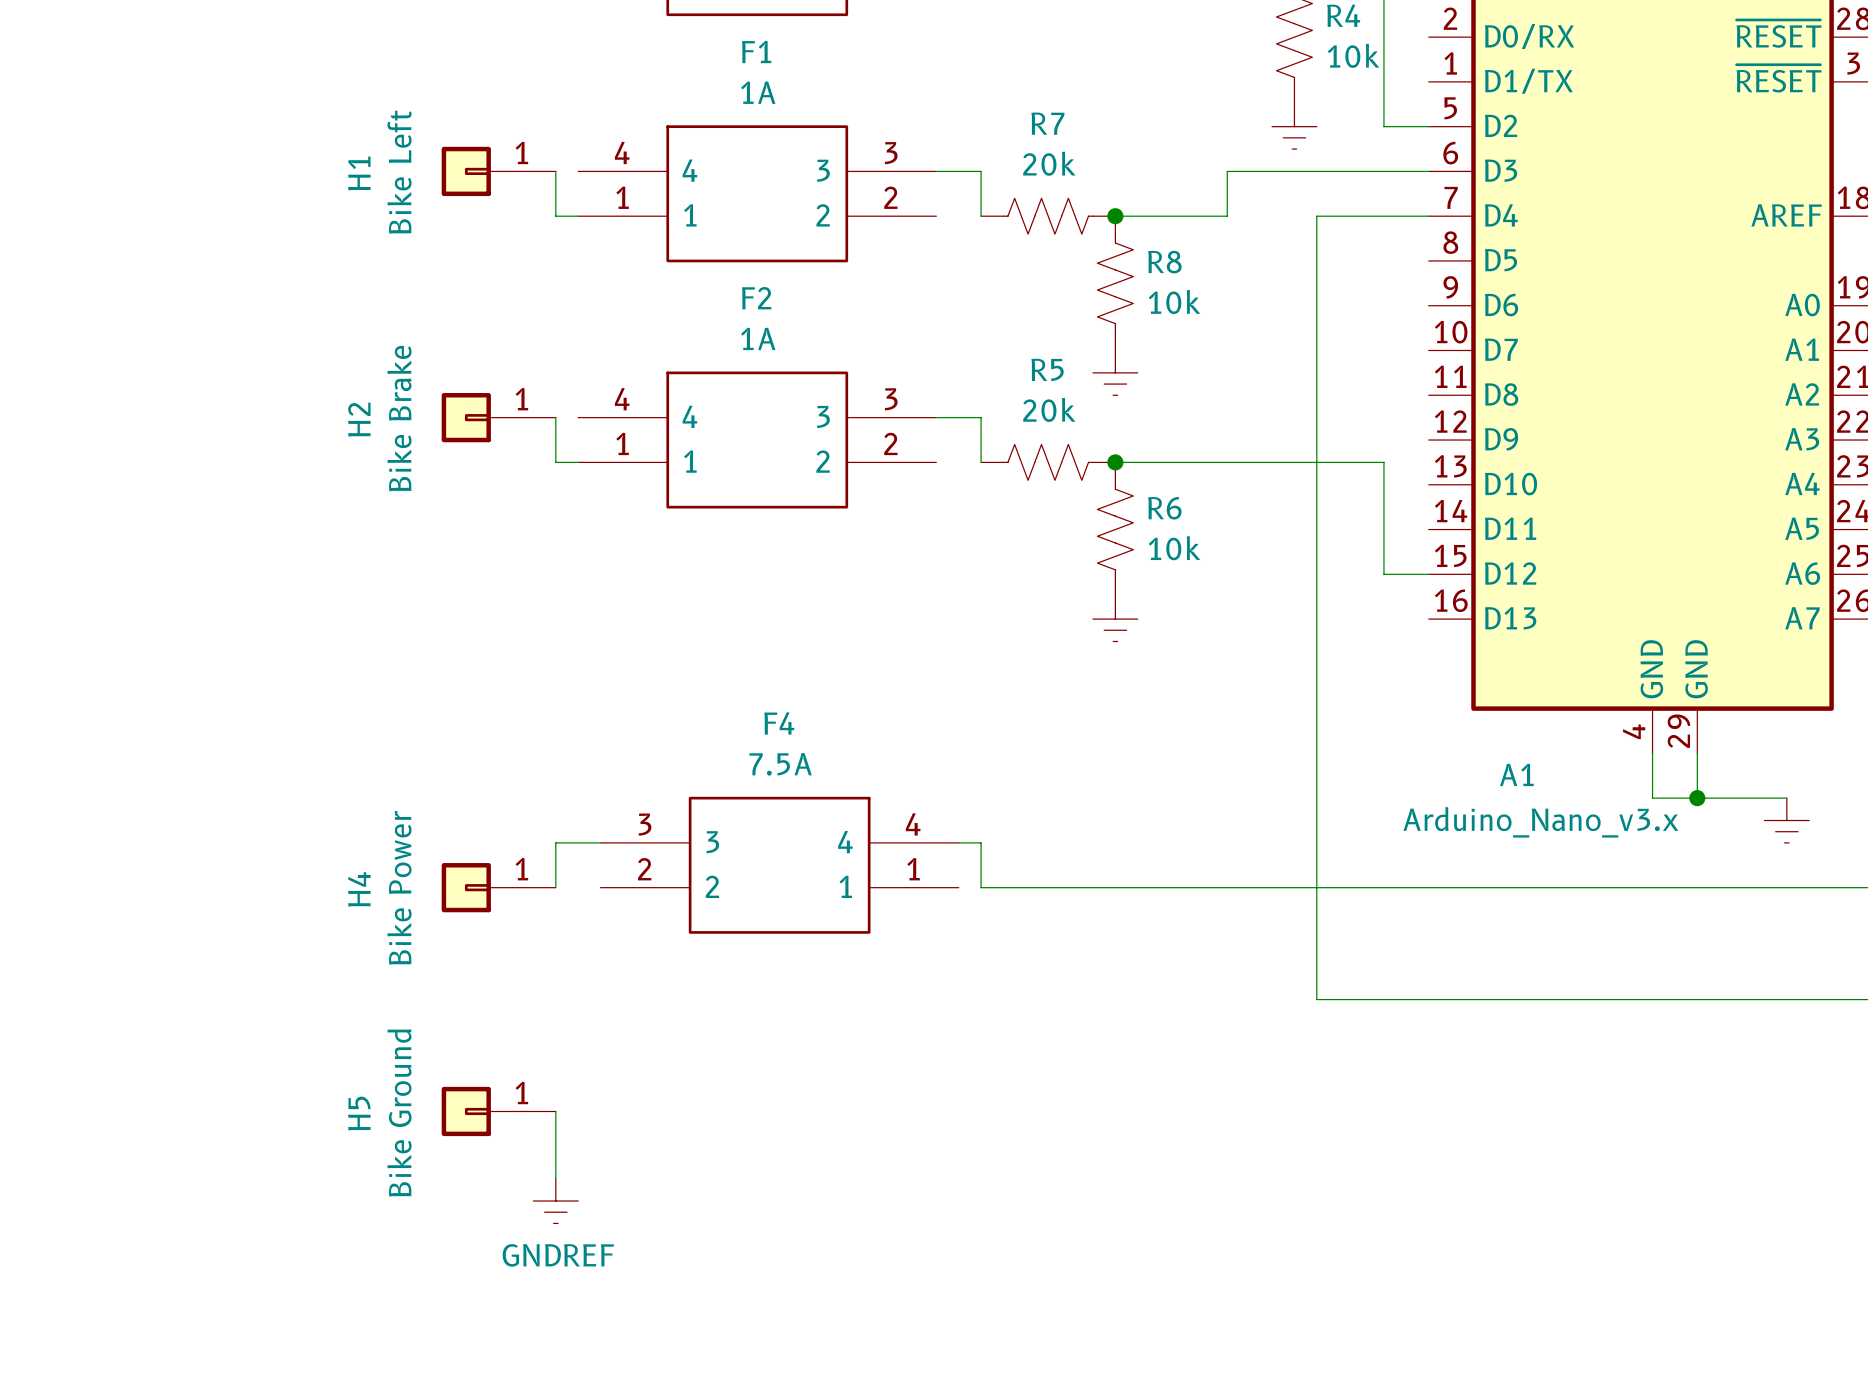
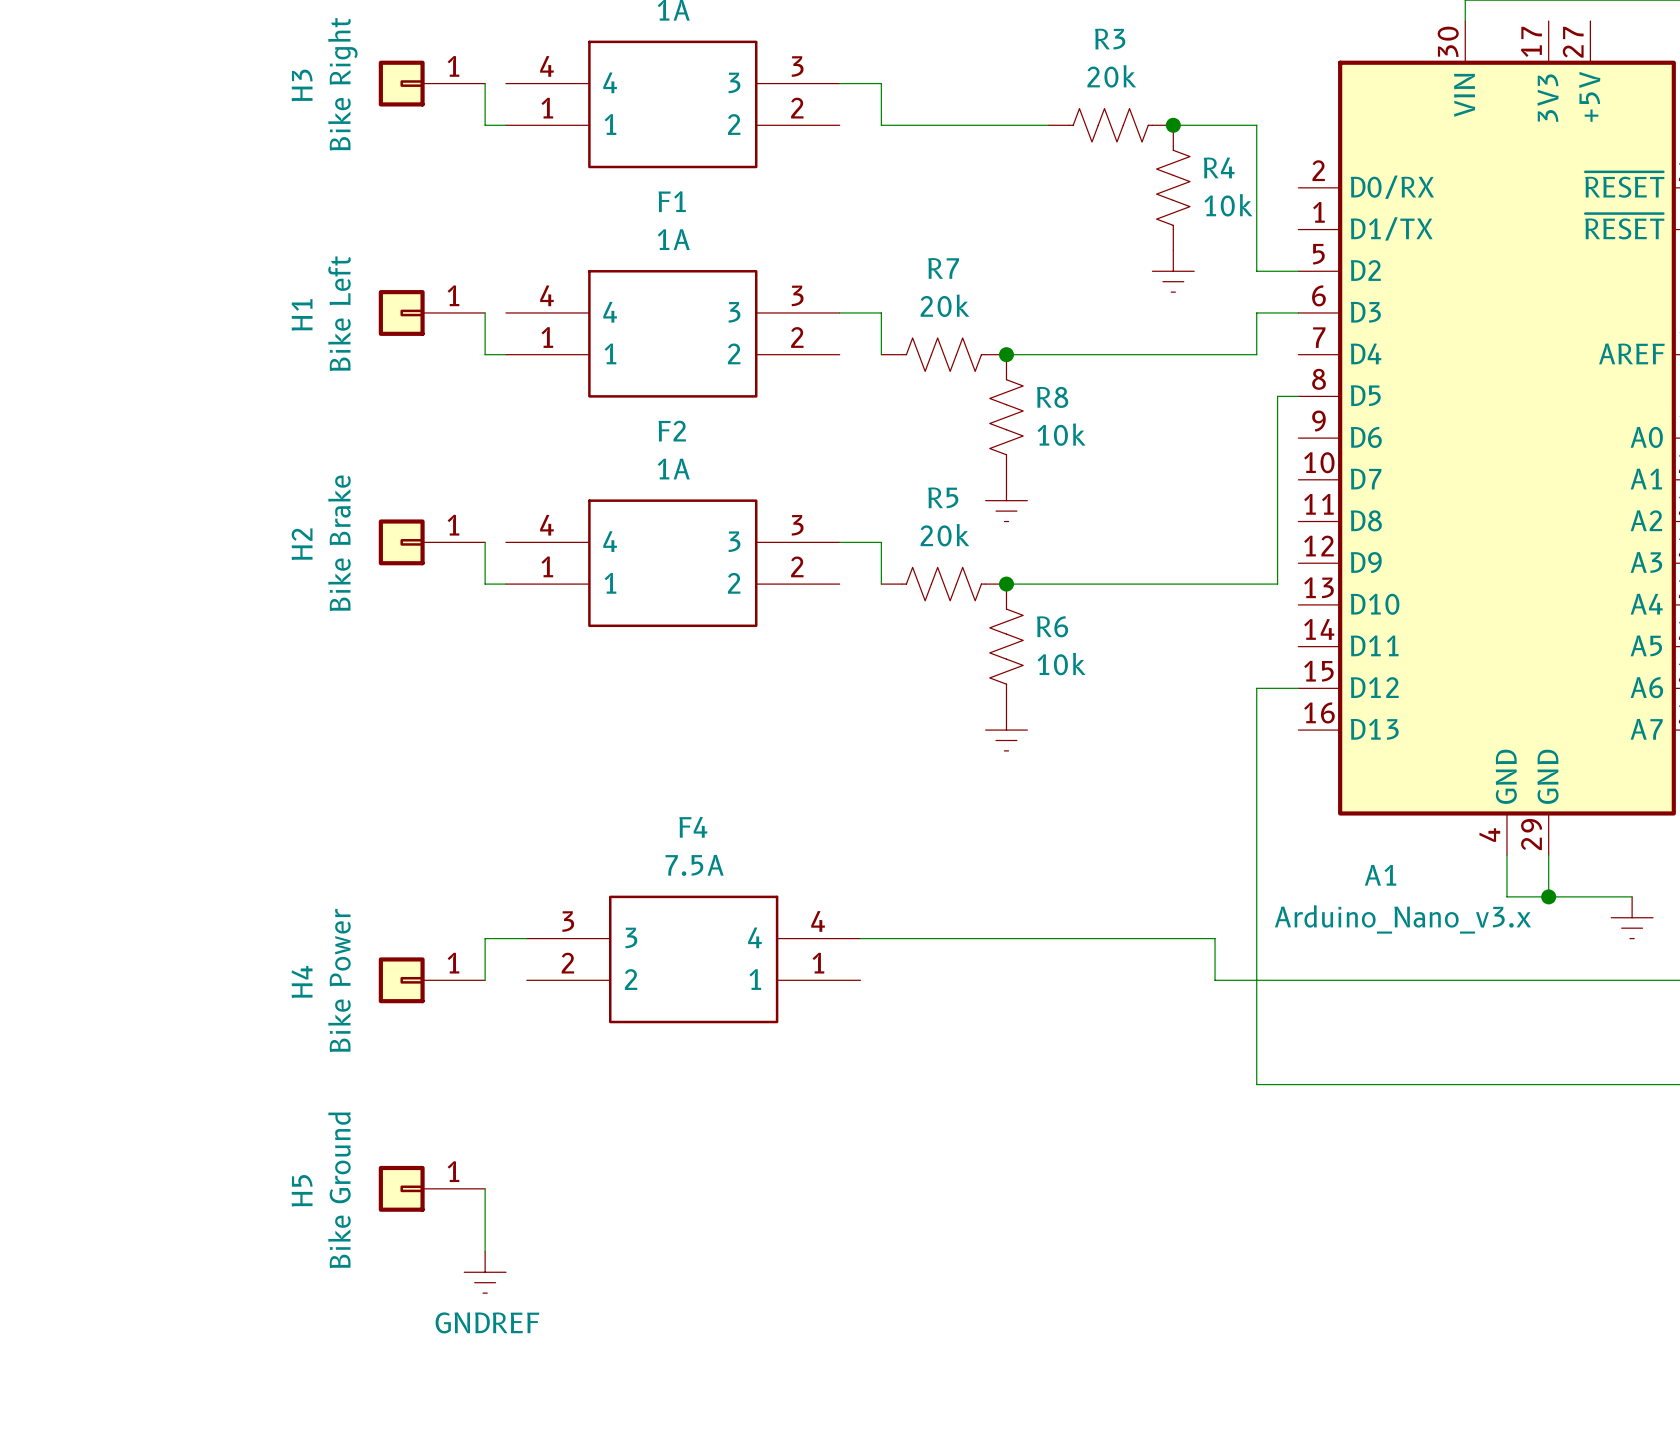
wire: (1383, 171) (1227, 171) (1227, 216) -> (1194, 354) (1110, 354)
wire: (1316, 216) (1316, 999) (1383, 999) -> (1256, 688) (1256, 1084)
wire: (1383, 216) (1428, 216) -> (1256, 354) (1256, 312)
wire: (1383, 462) (1383, 574) -> (1256, 584) (1277, 584) (1277, 396) (1298, 396)
wire: (981, 842) (981, 887) (1339, 887) -> (881, 938) (1215, 938) (1215, 980)

